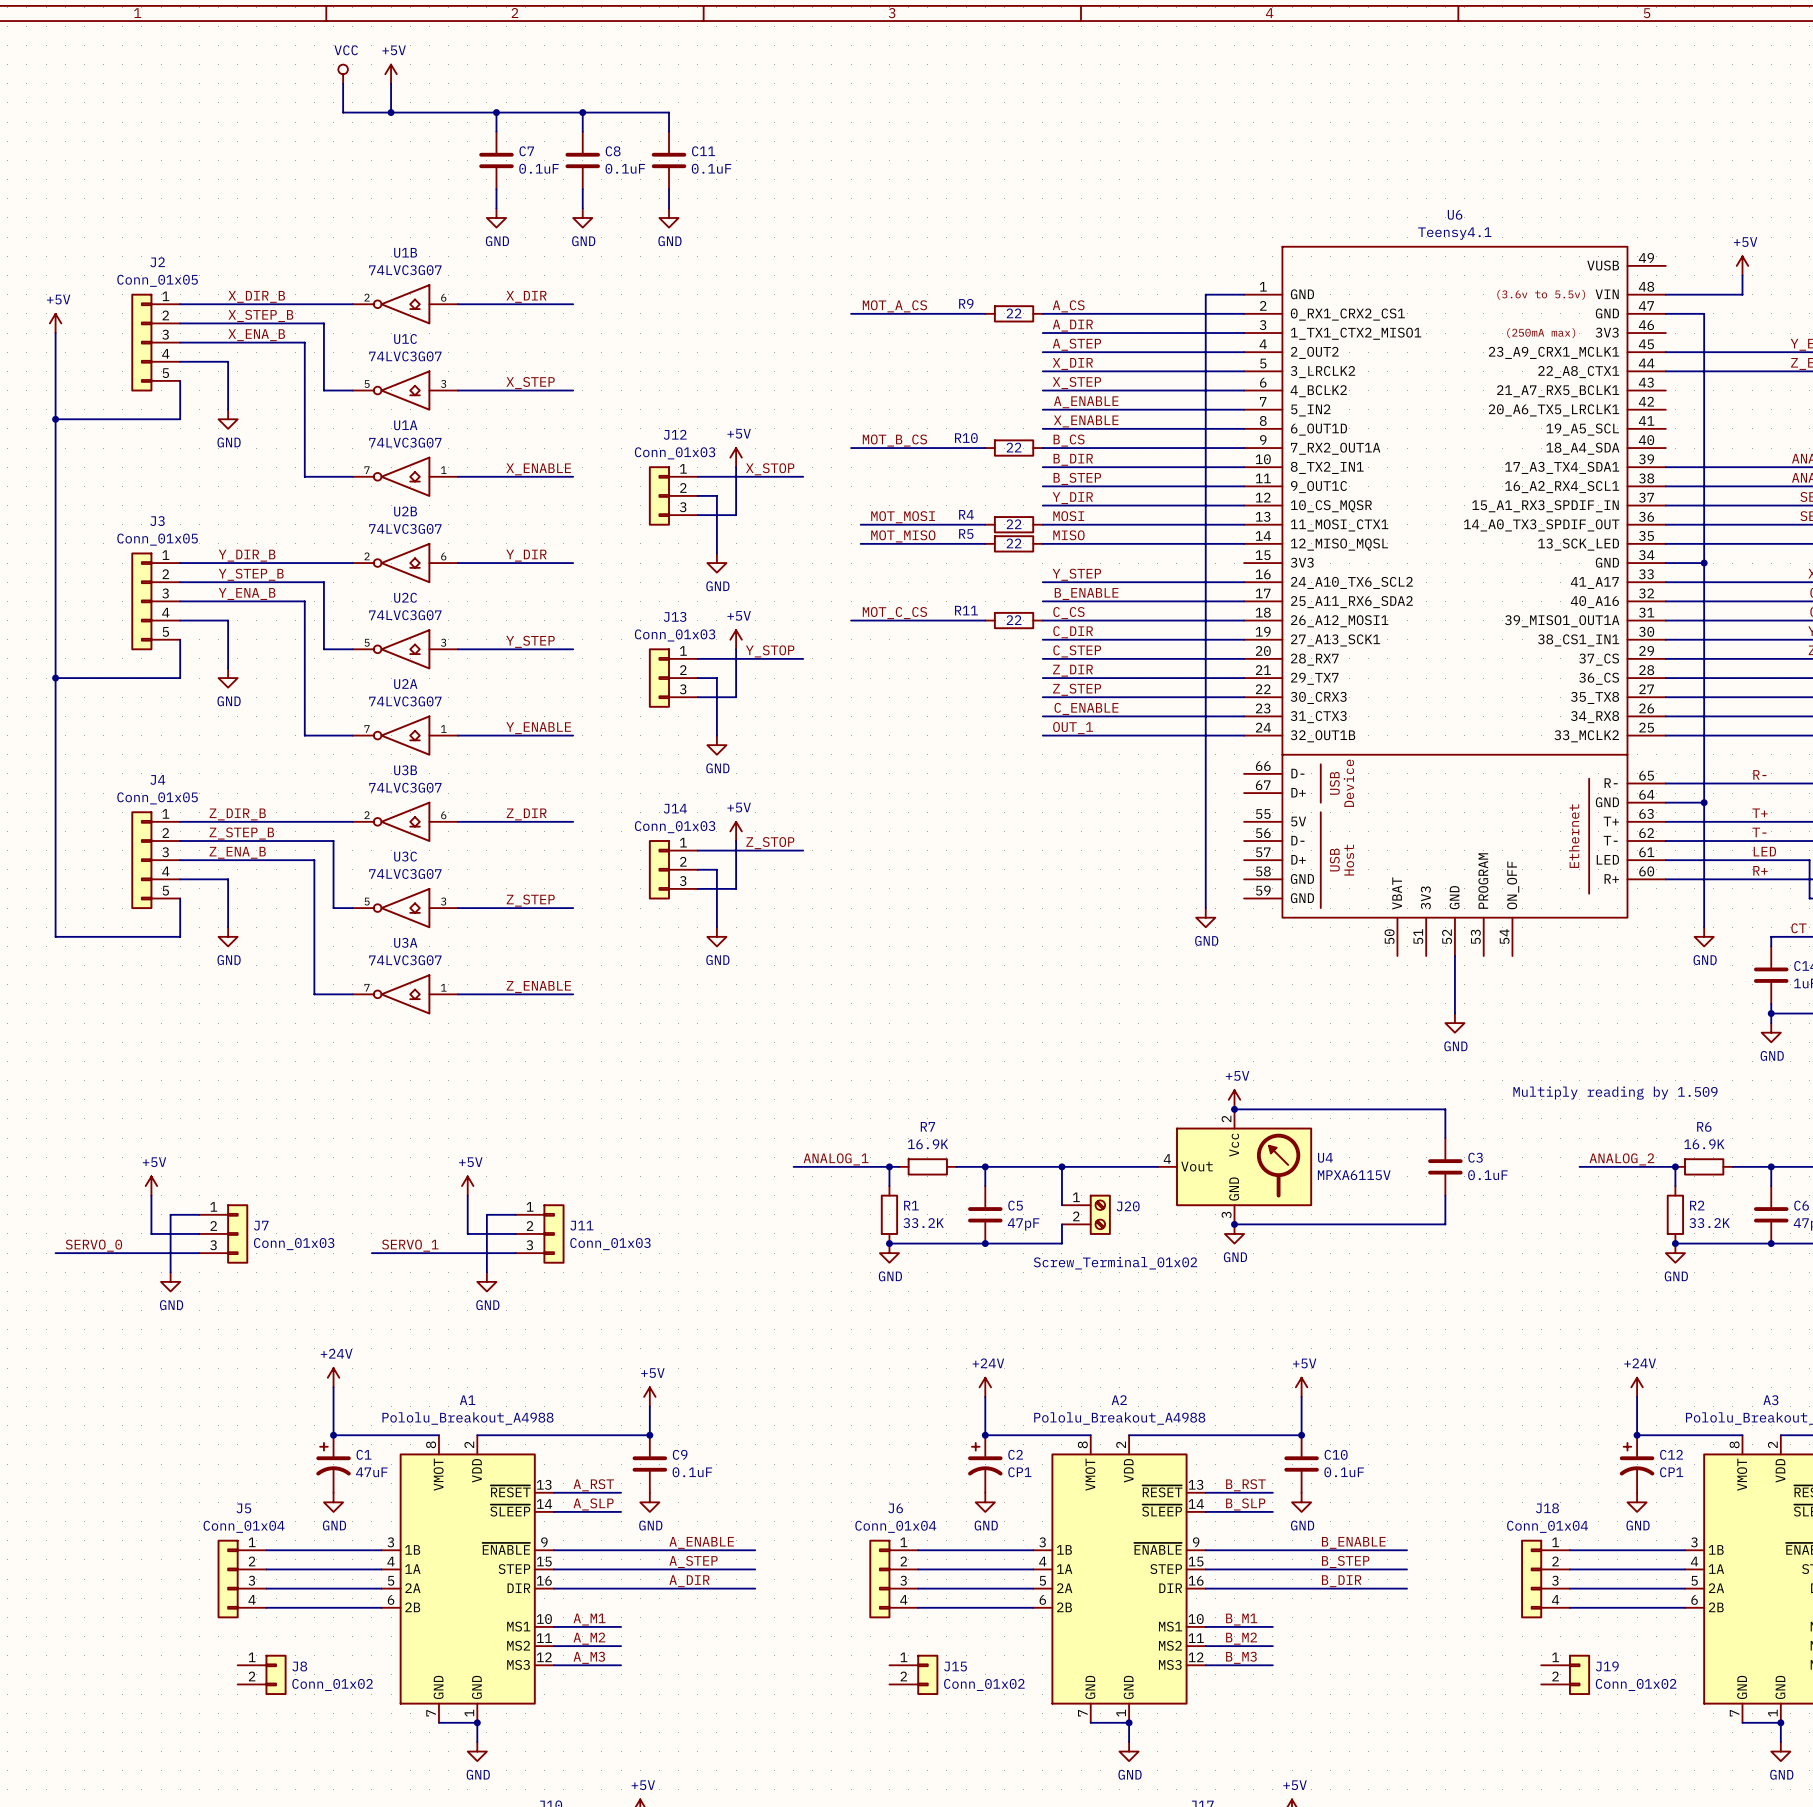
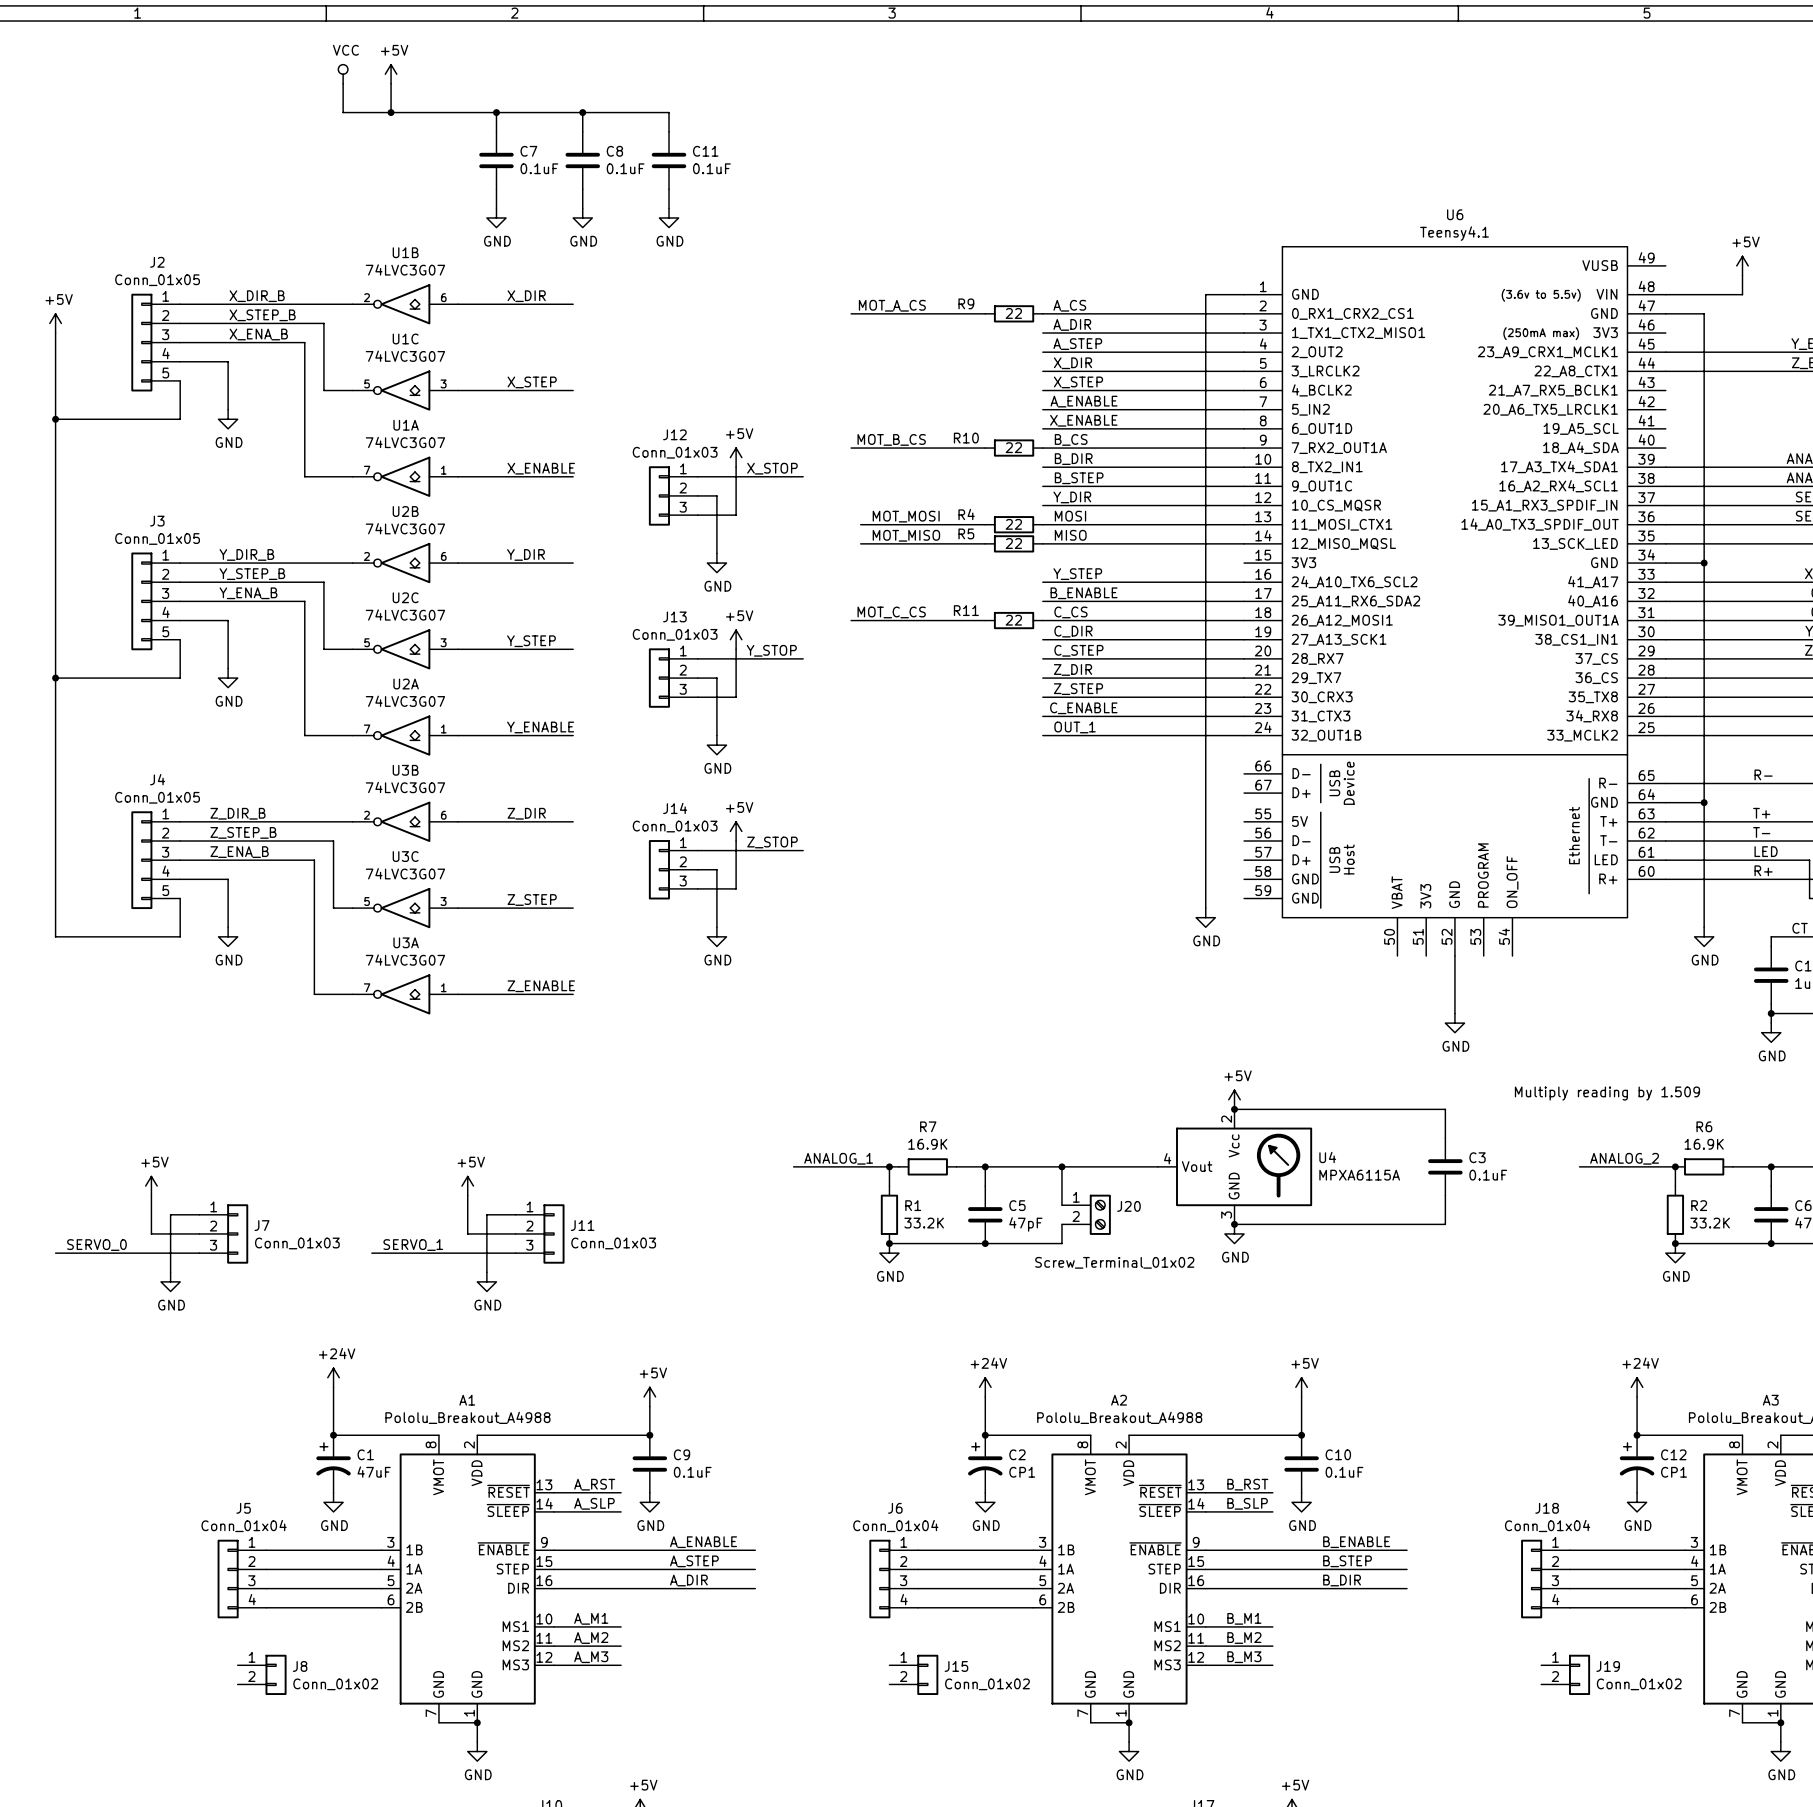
U4 value: MPXA6115V (1354, 1175) -> MPXA6115A (1359, 1175)

